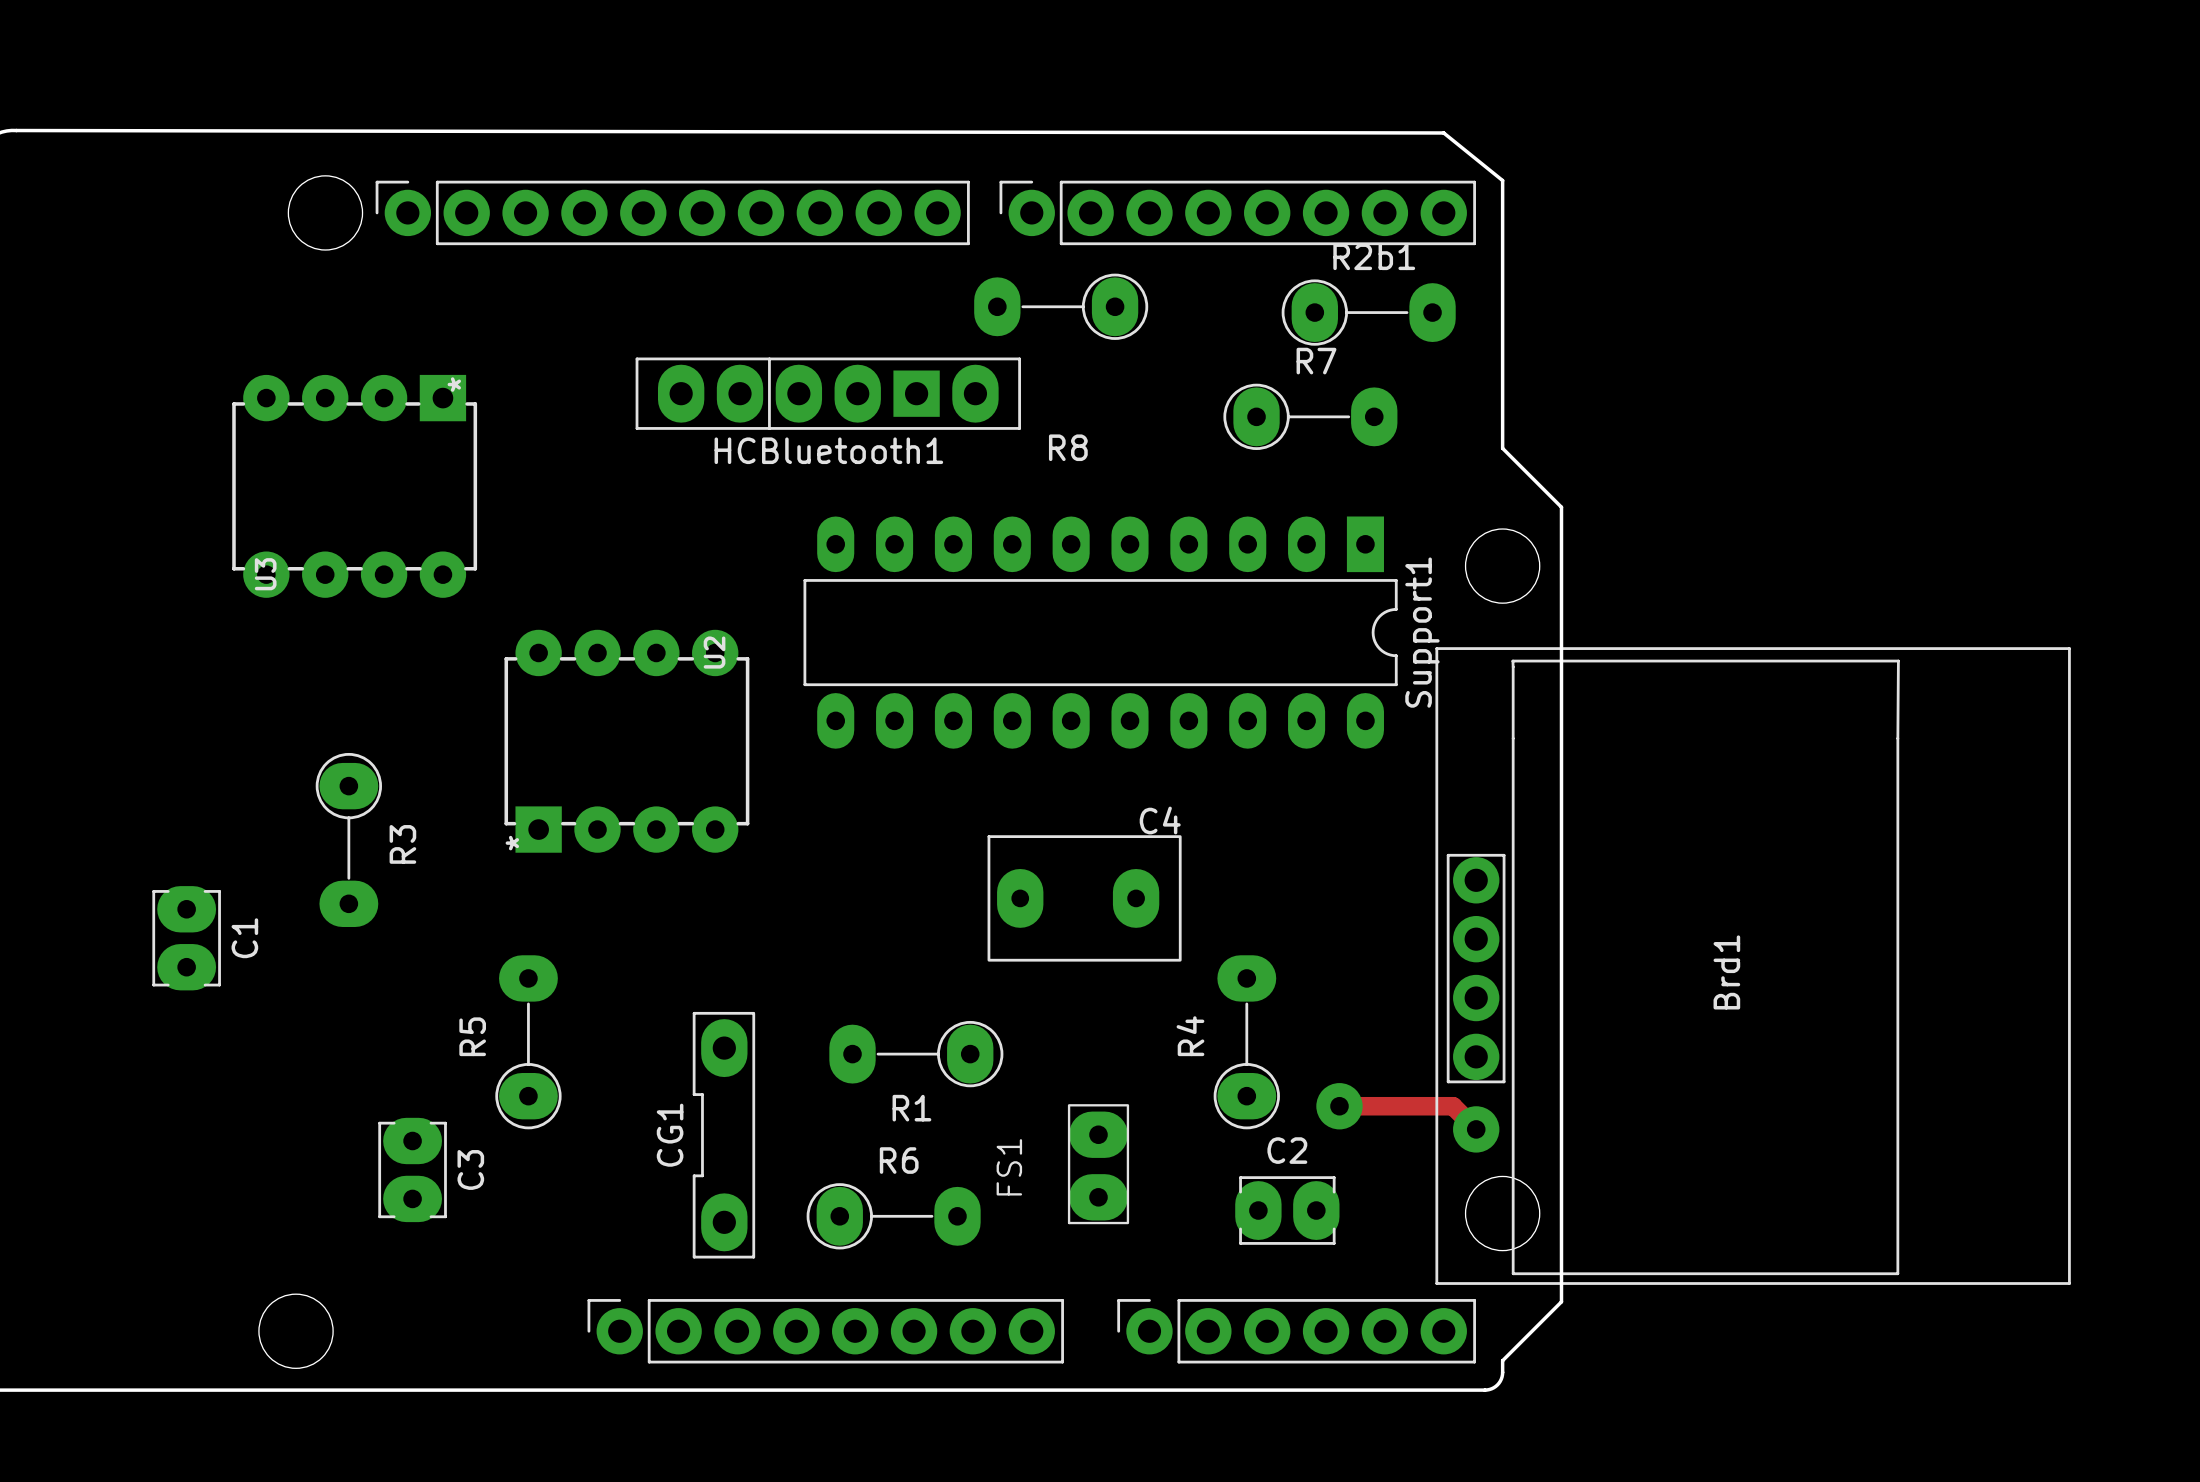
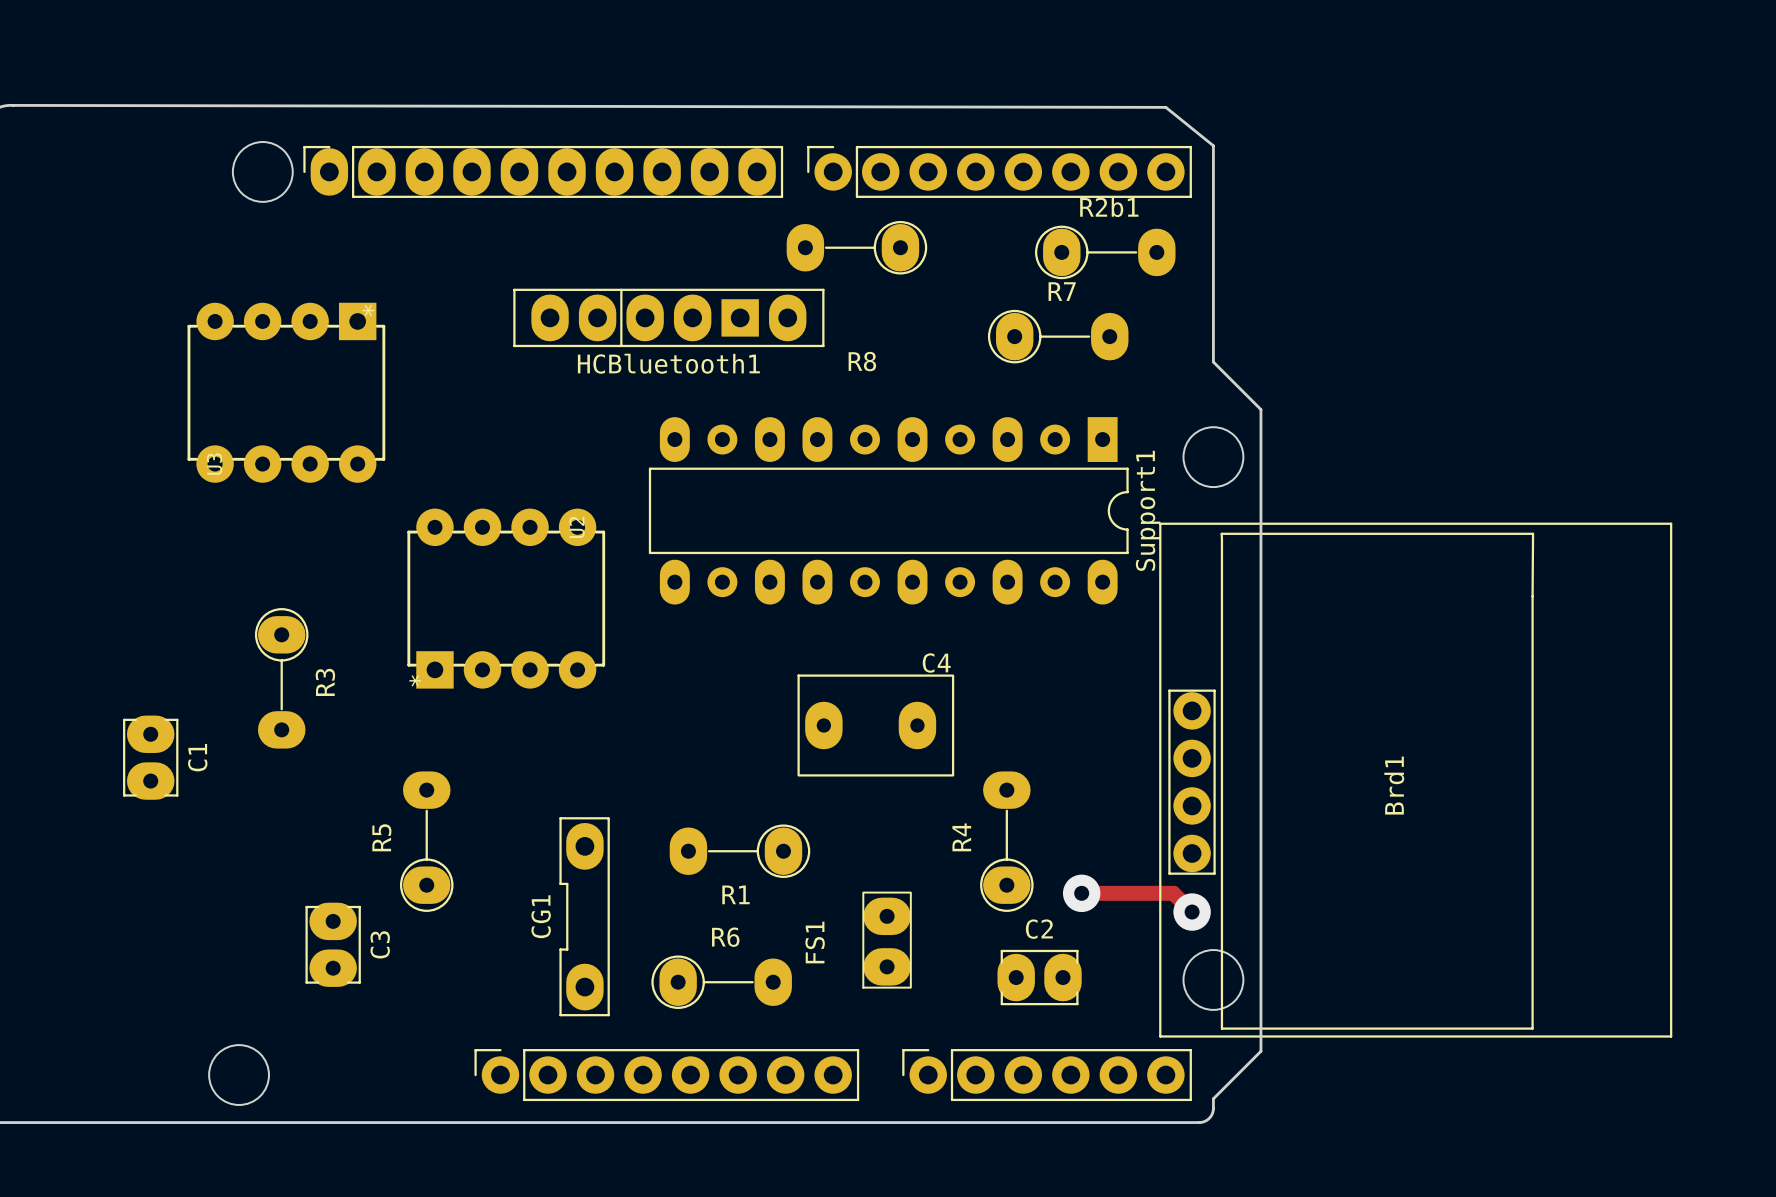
part footprint: [375, 180, 970, 246] -> [303, 145, 784, 198]
Support1 footprint: [803, 516, 1398, 749] -> [648, 417, 1129, 605]

